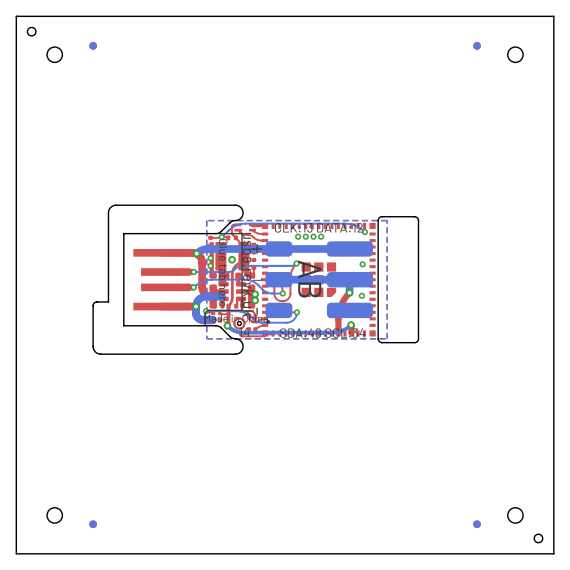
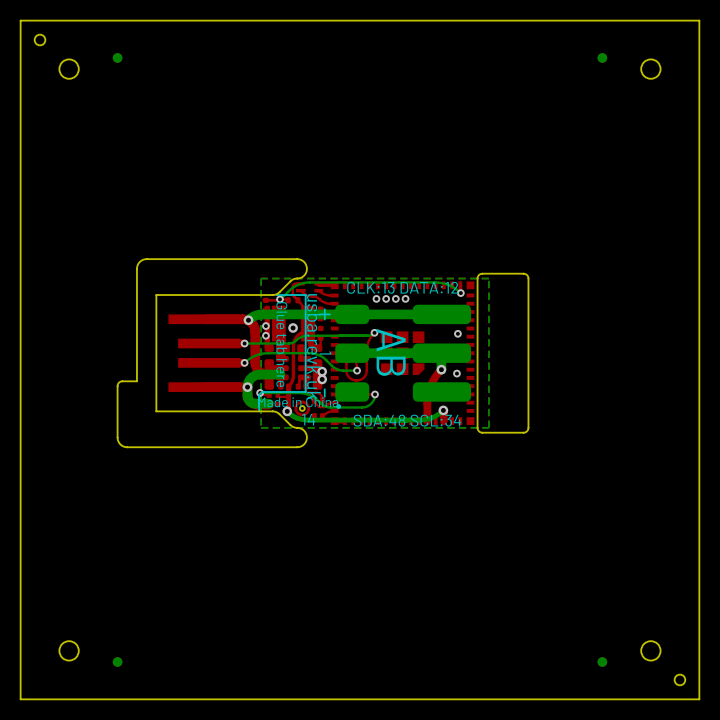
top track: (239, 333) (242, 336) (265, 335) -> none

